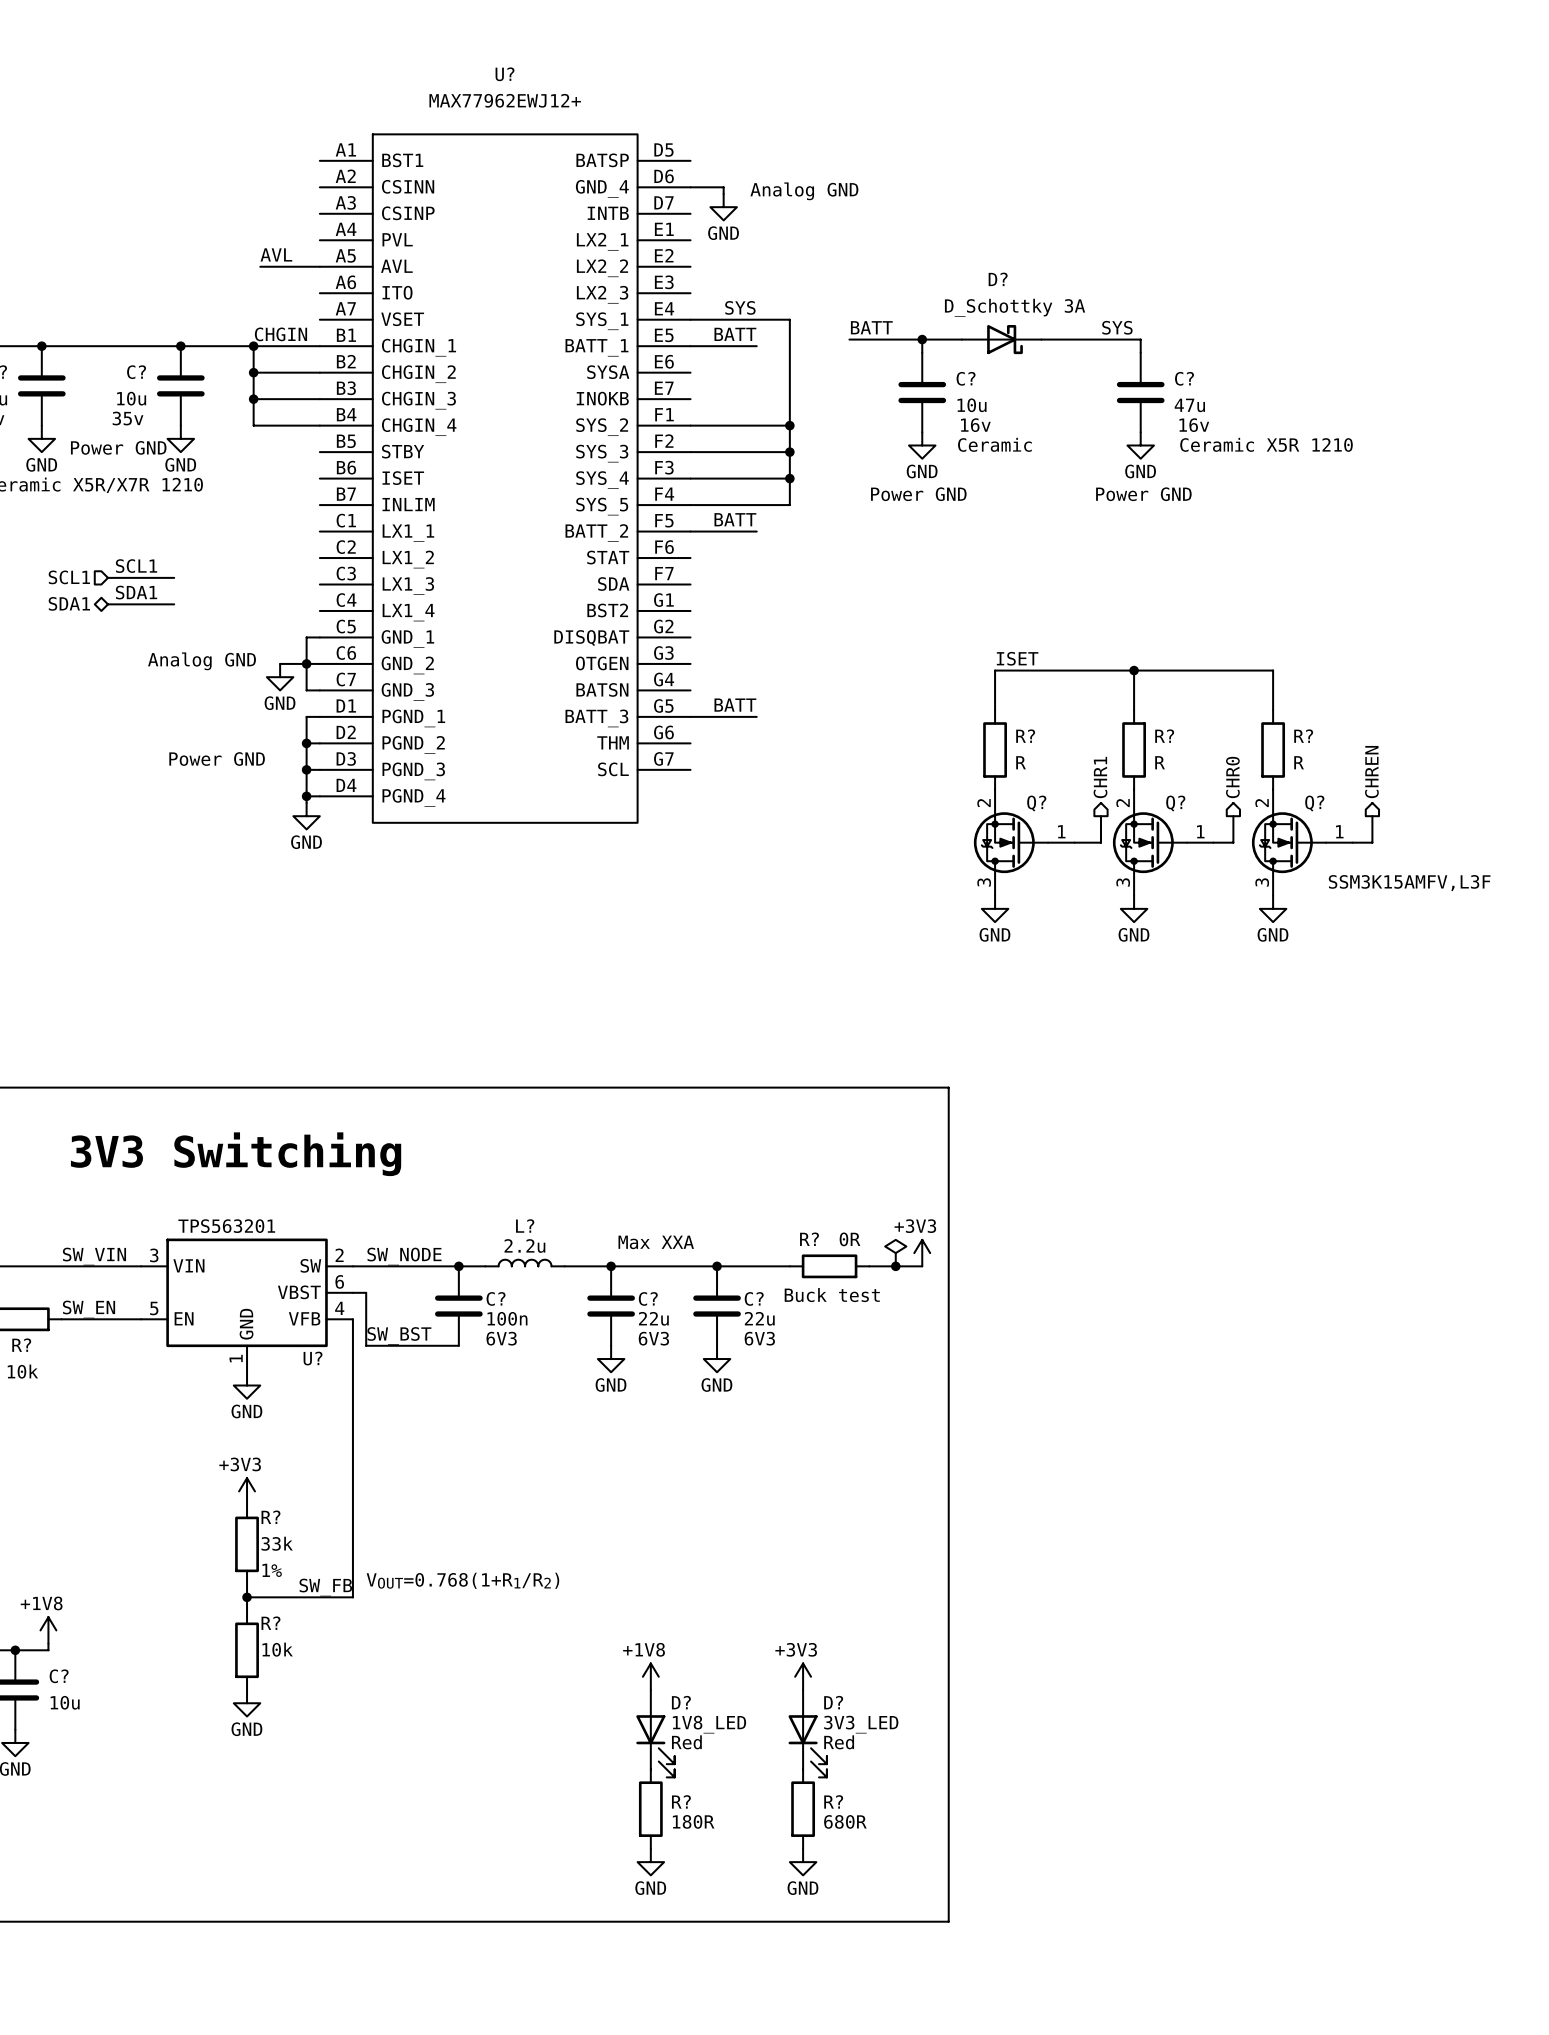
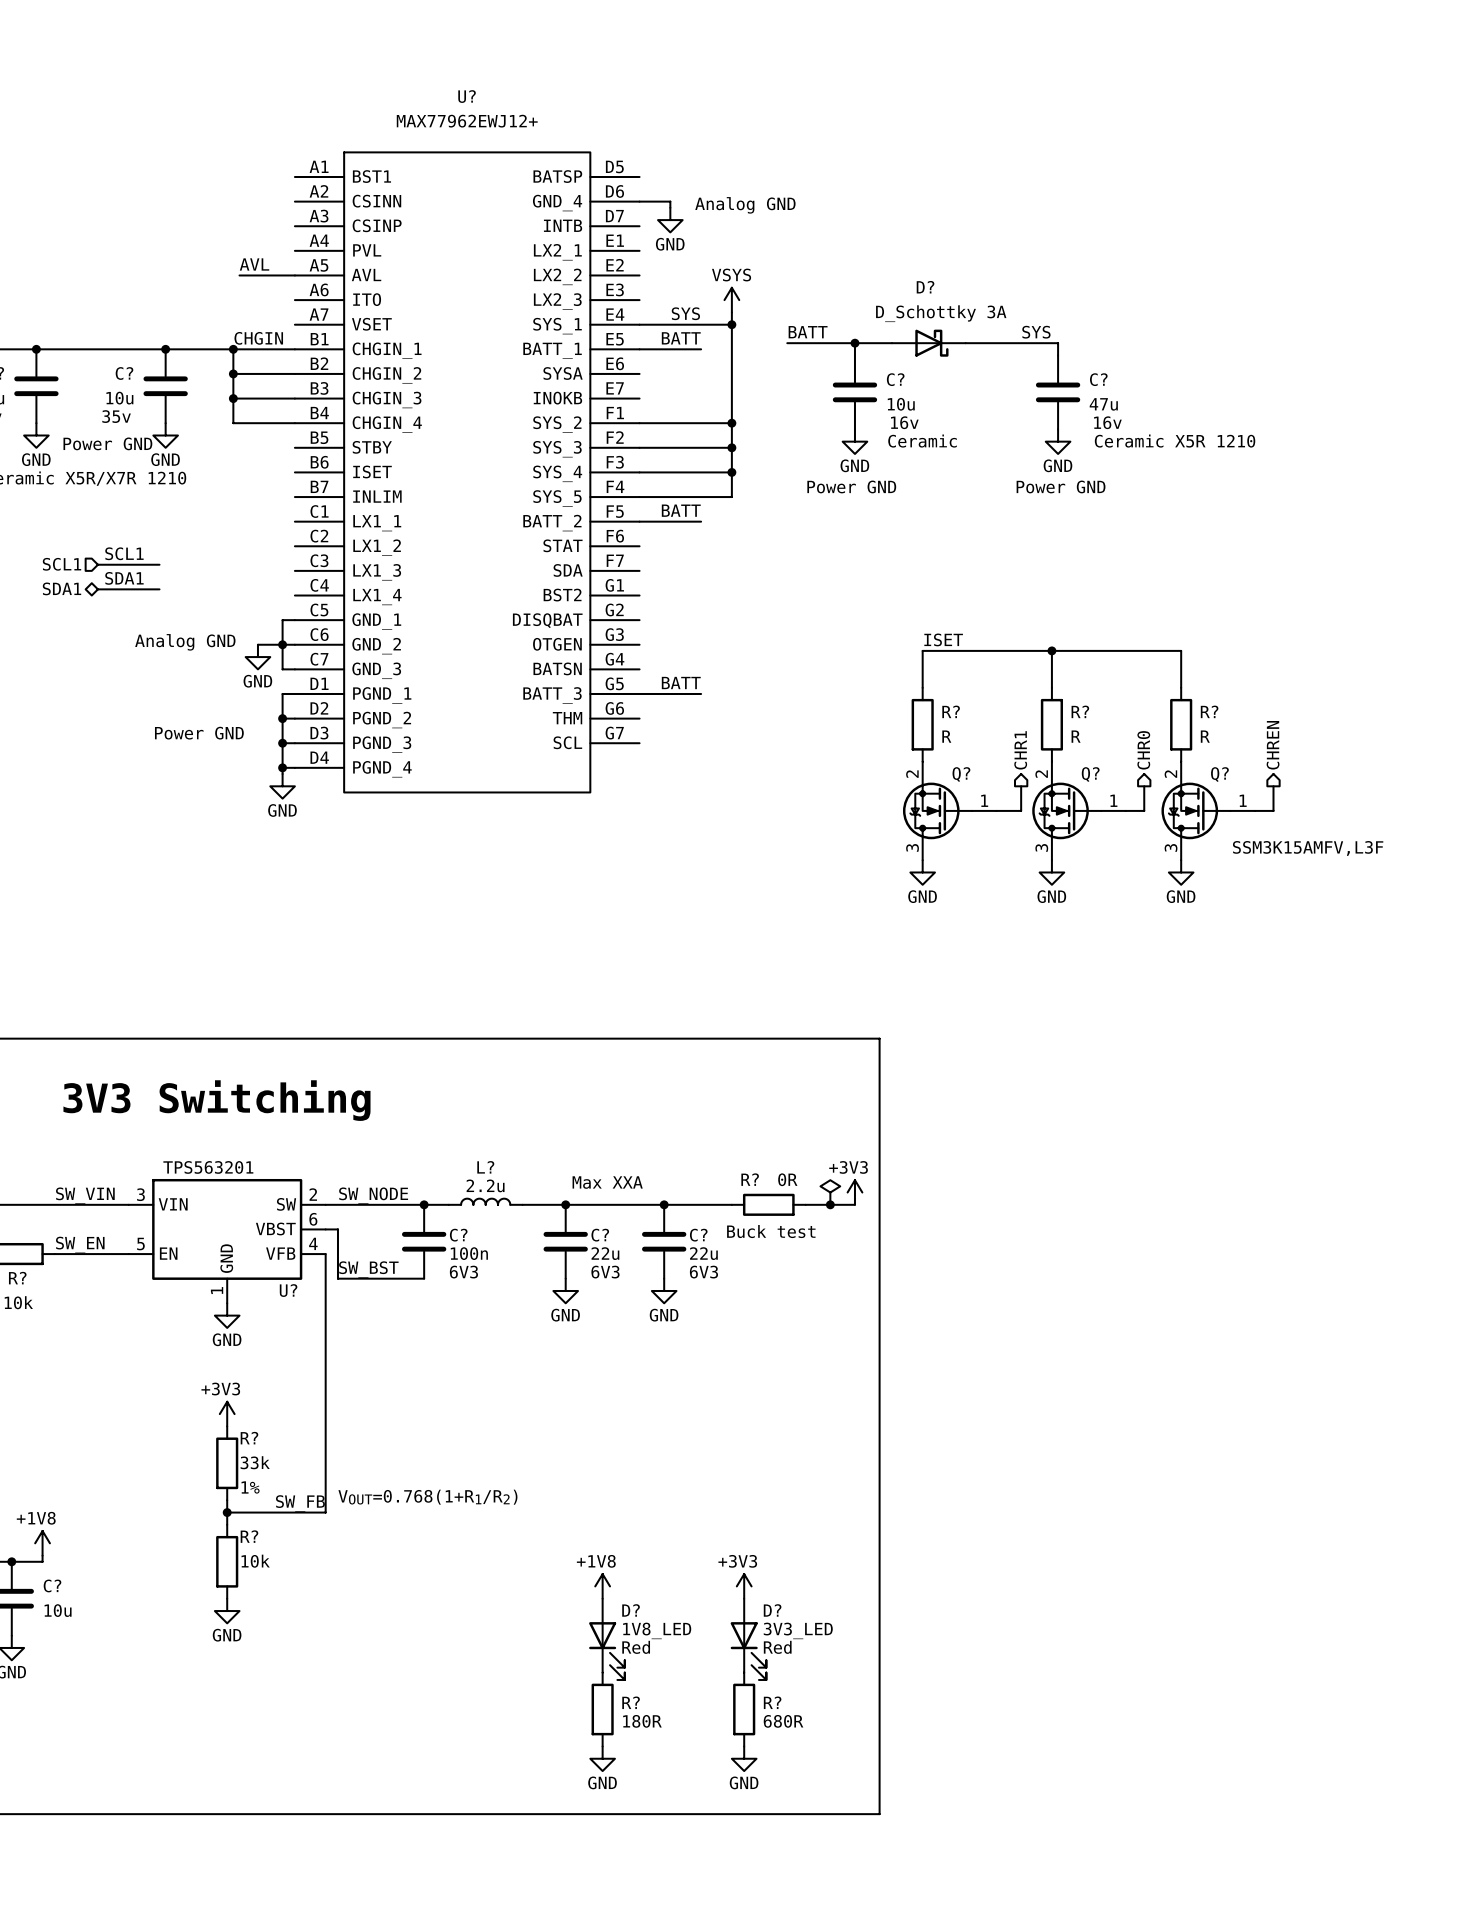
power symbol: none -> VSYS (731, 300)
wire: none -> (731, 312) (731, 324)
junction: none -> (731, 324)

